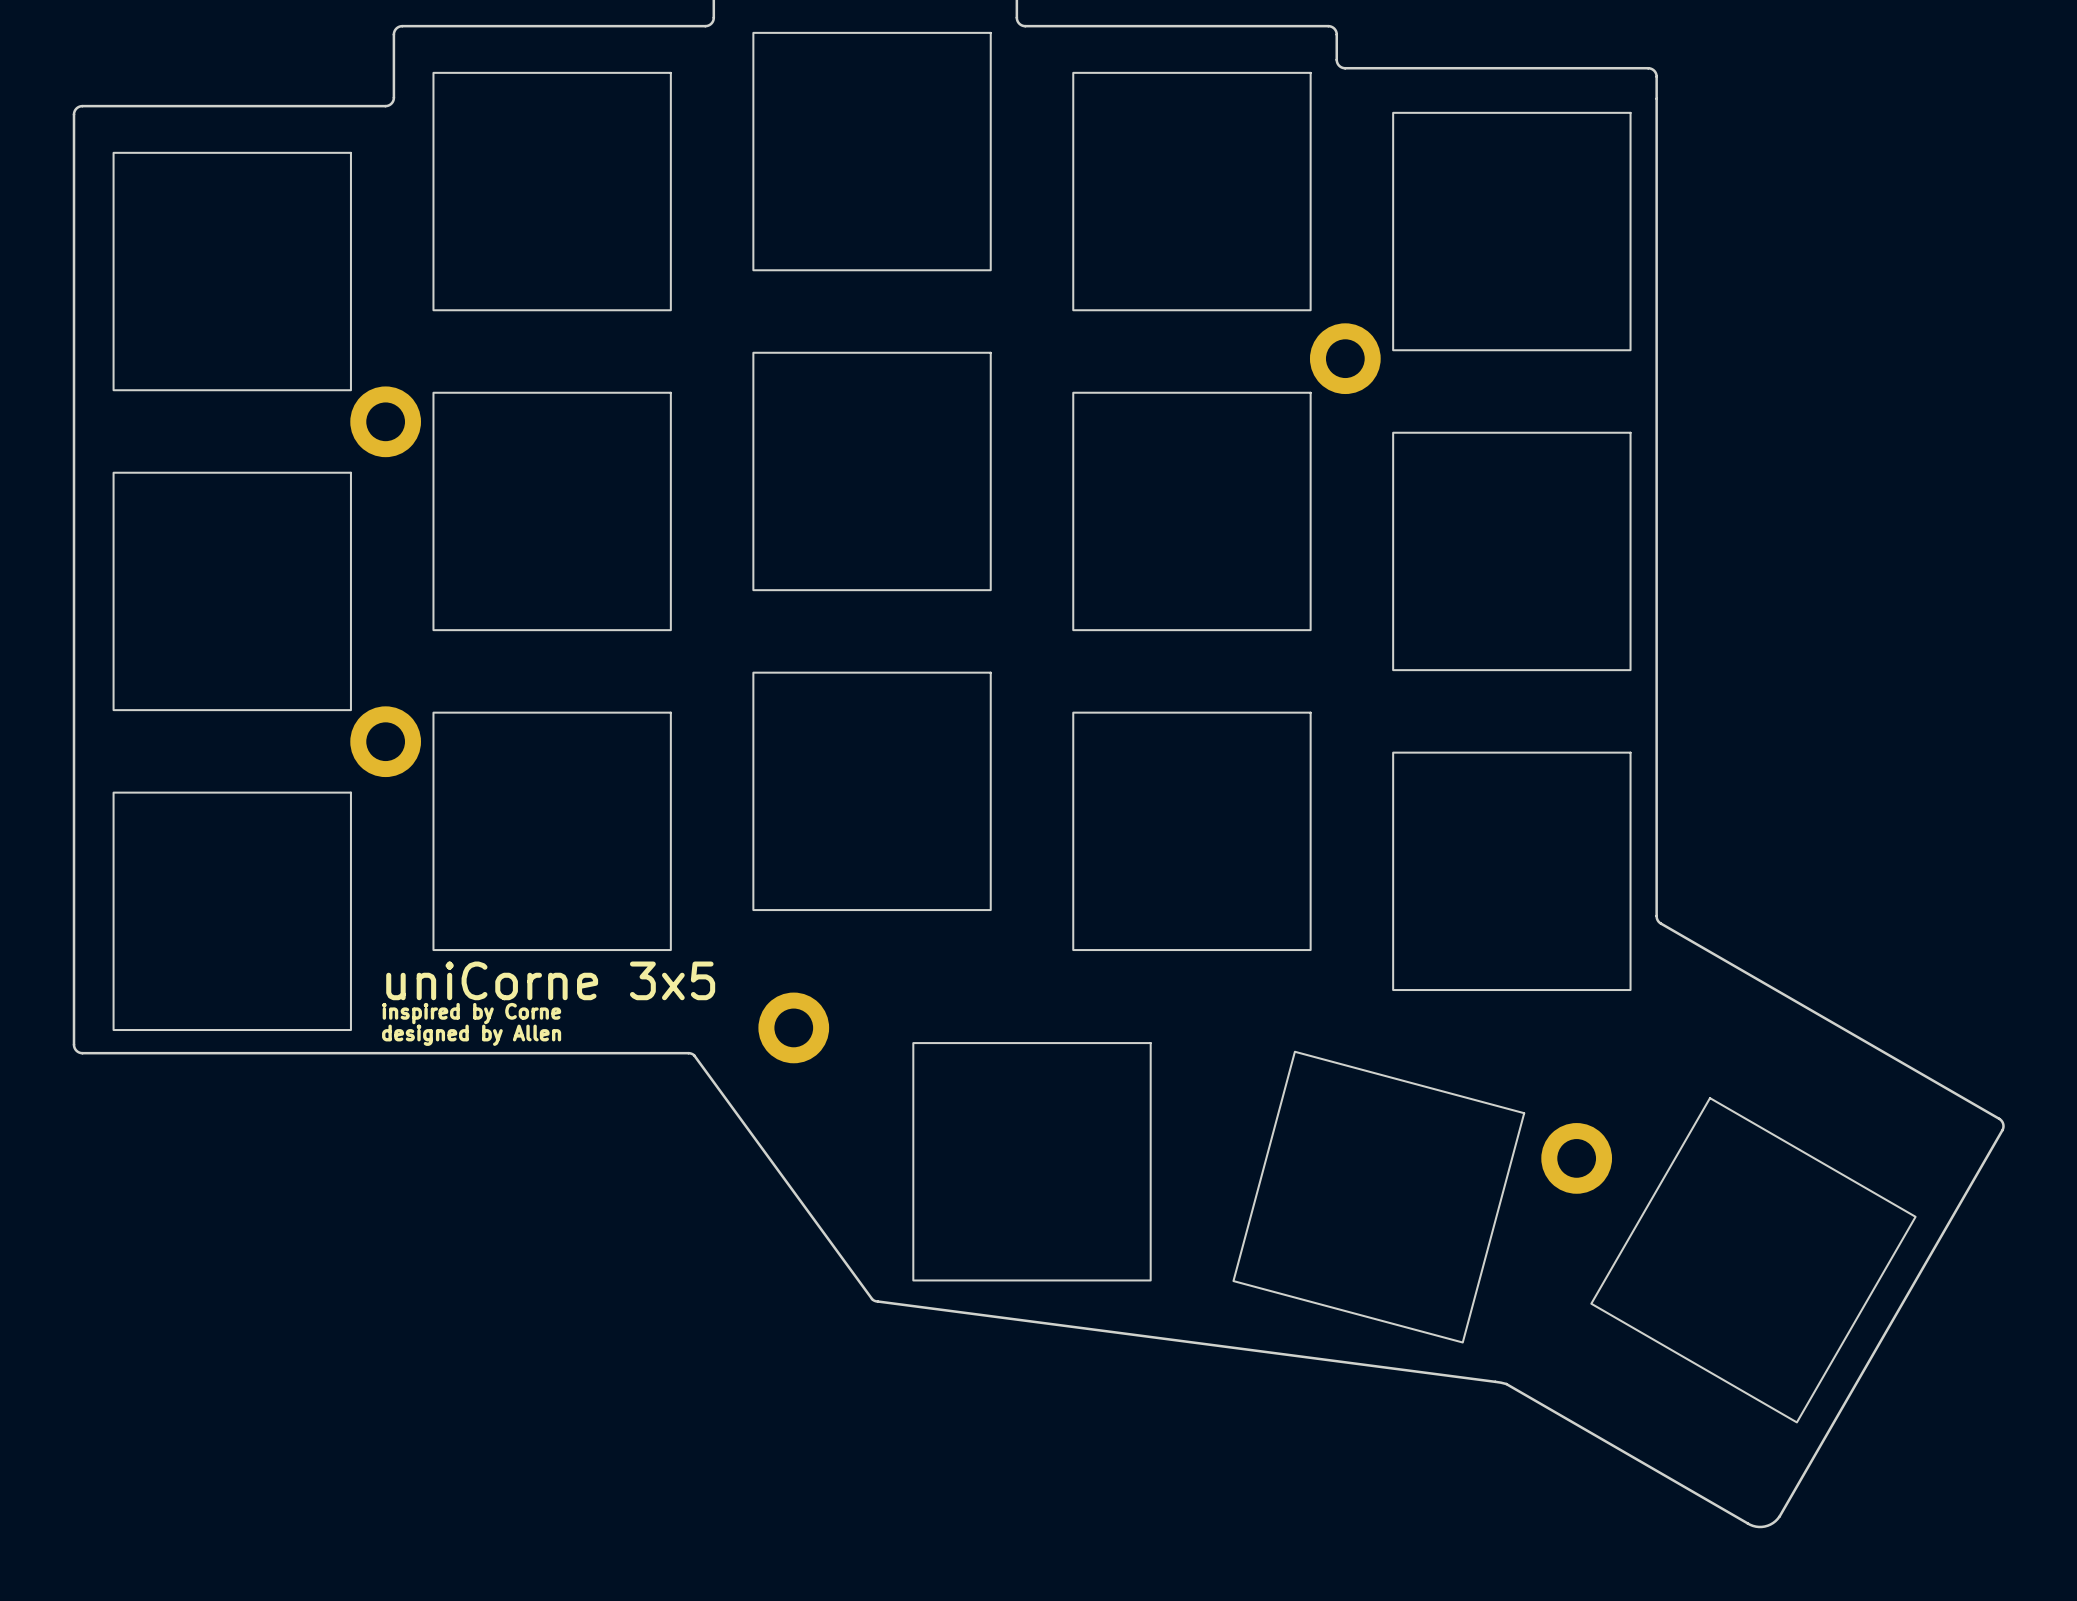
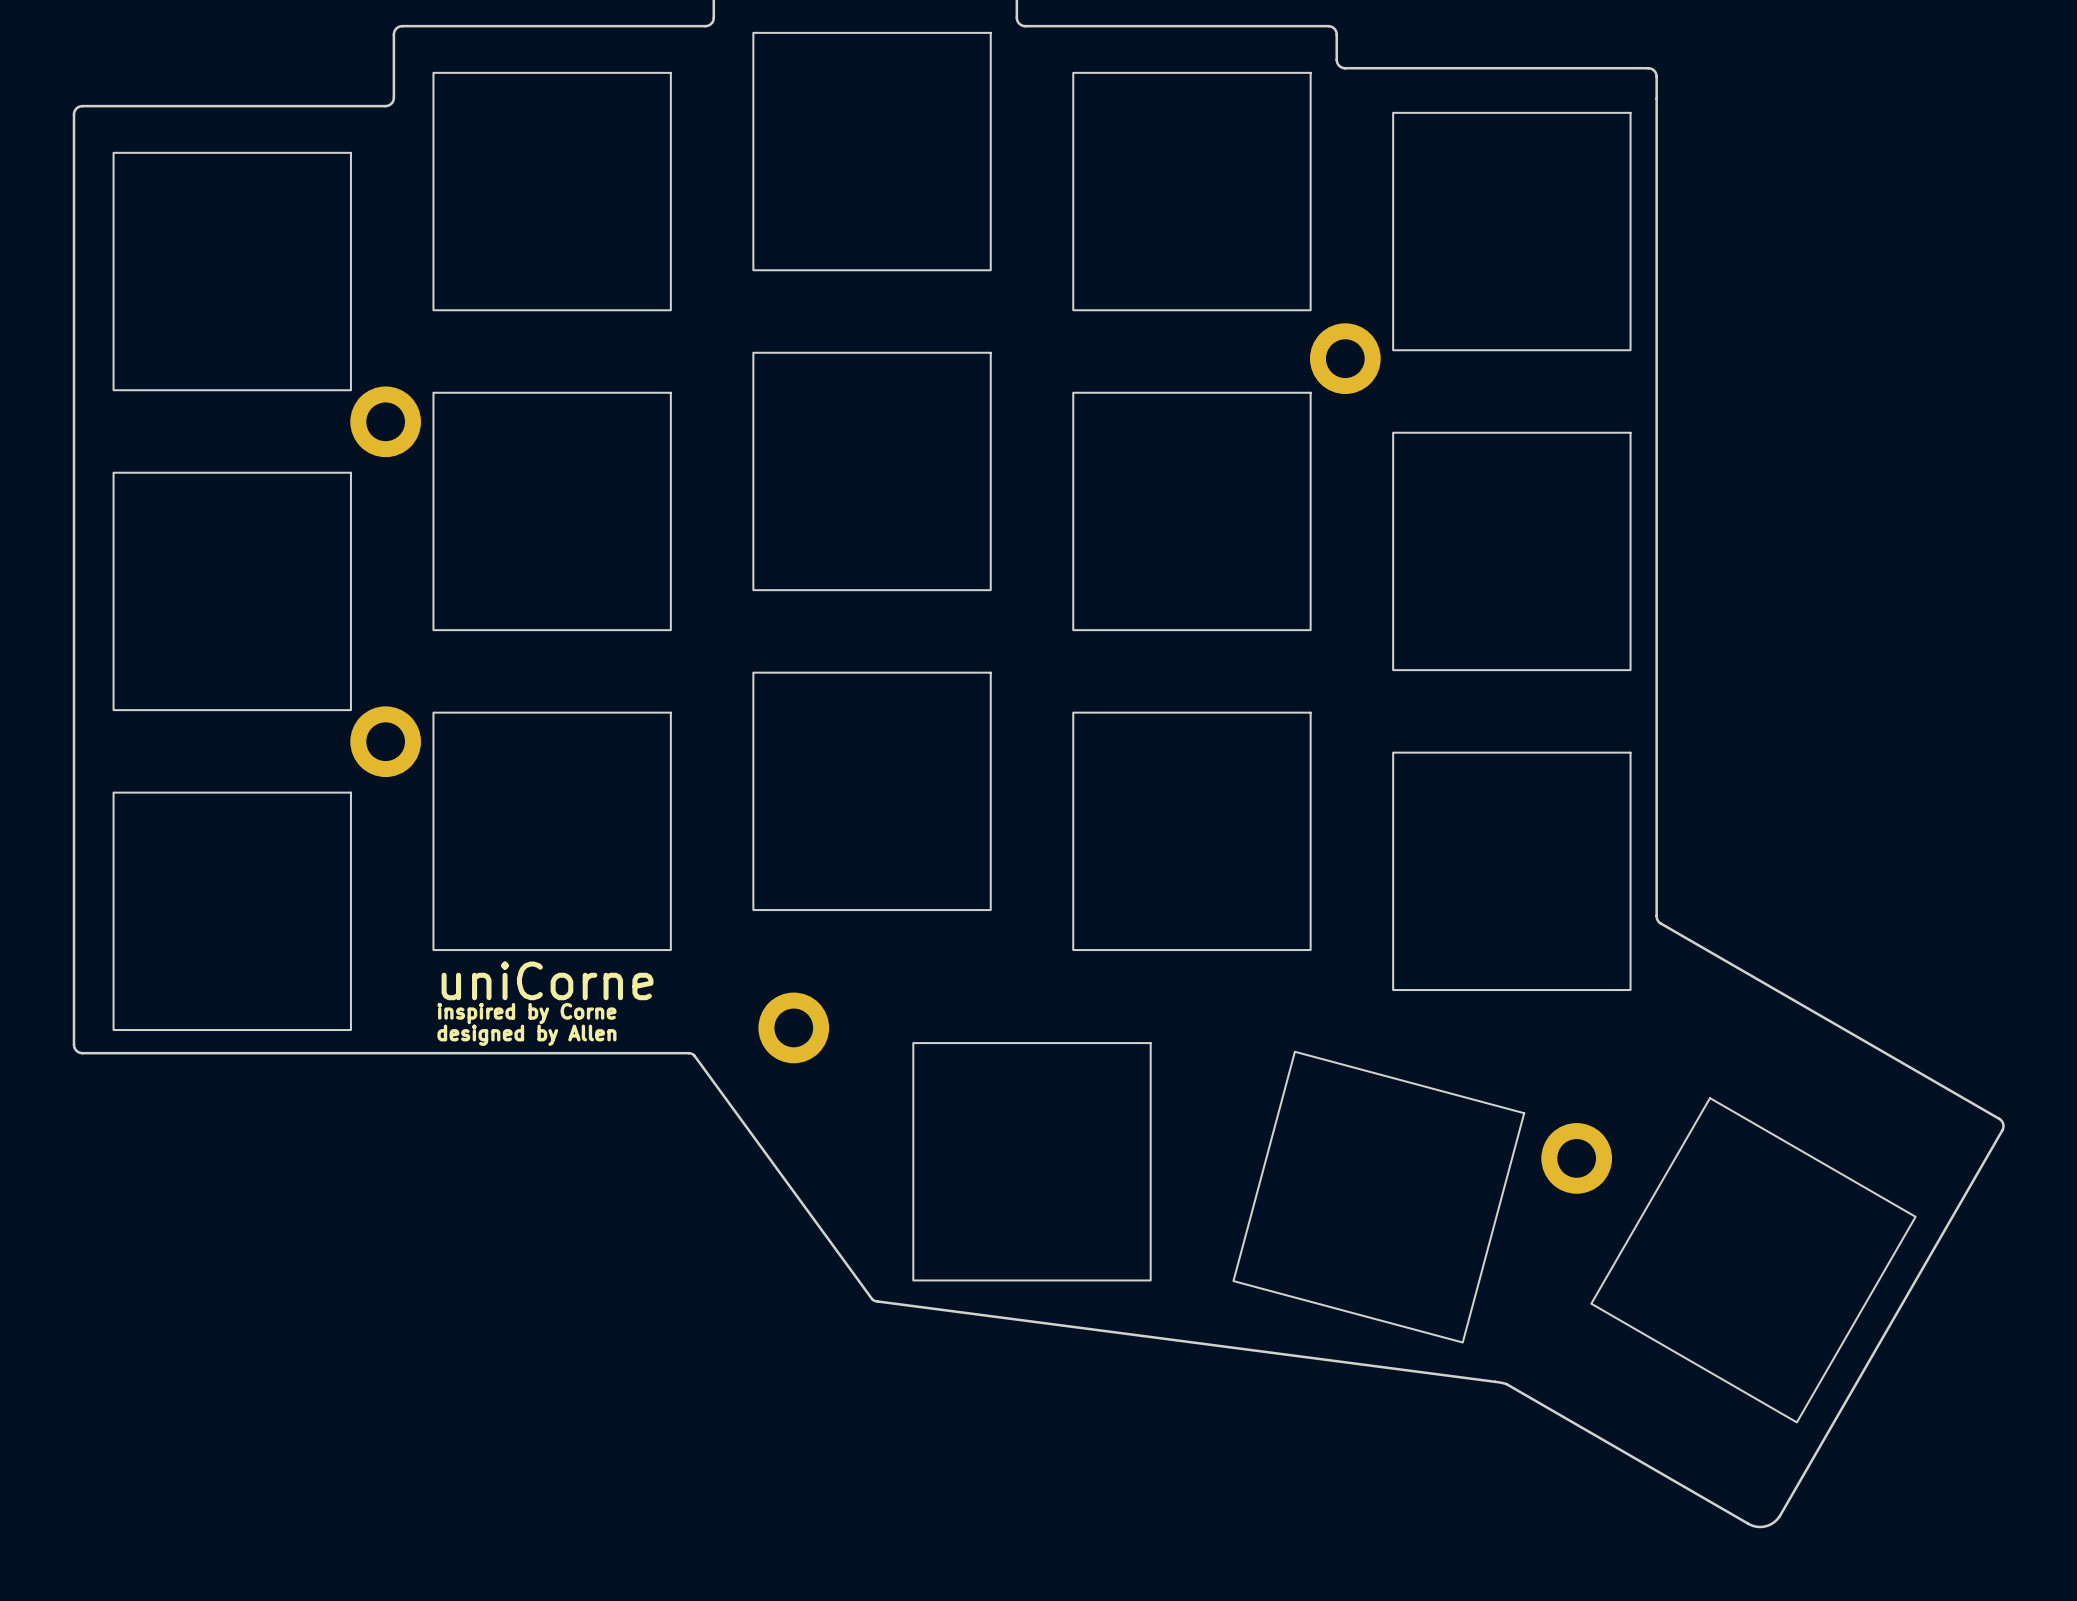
text: uniCorne 3x5 (550, 980) -> uniCorne (547, 980)
text position: inspired by Corne (471, 1013) -> inspired by Corne (526, 1013)
text position: designed by Allen (471, 1035) -> designed by Allen (526, 1035)

